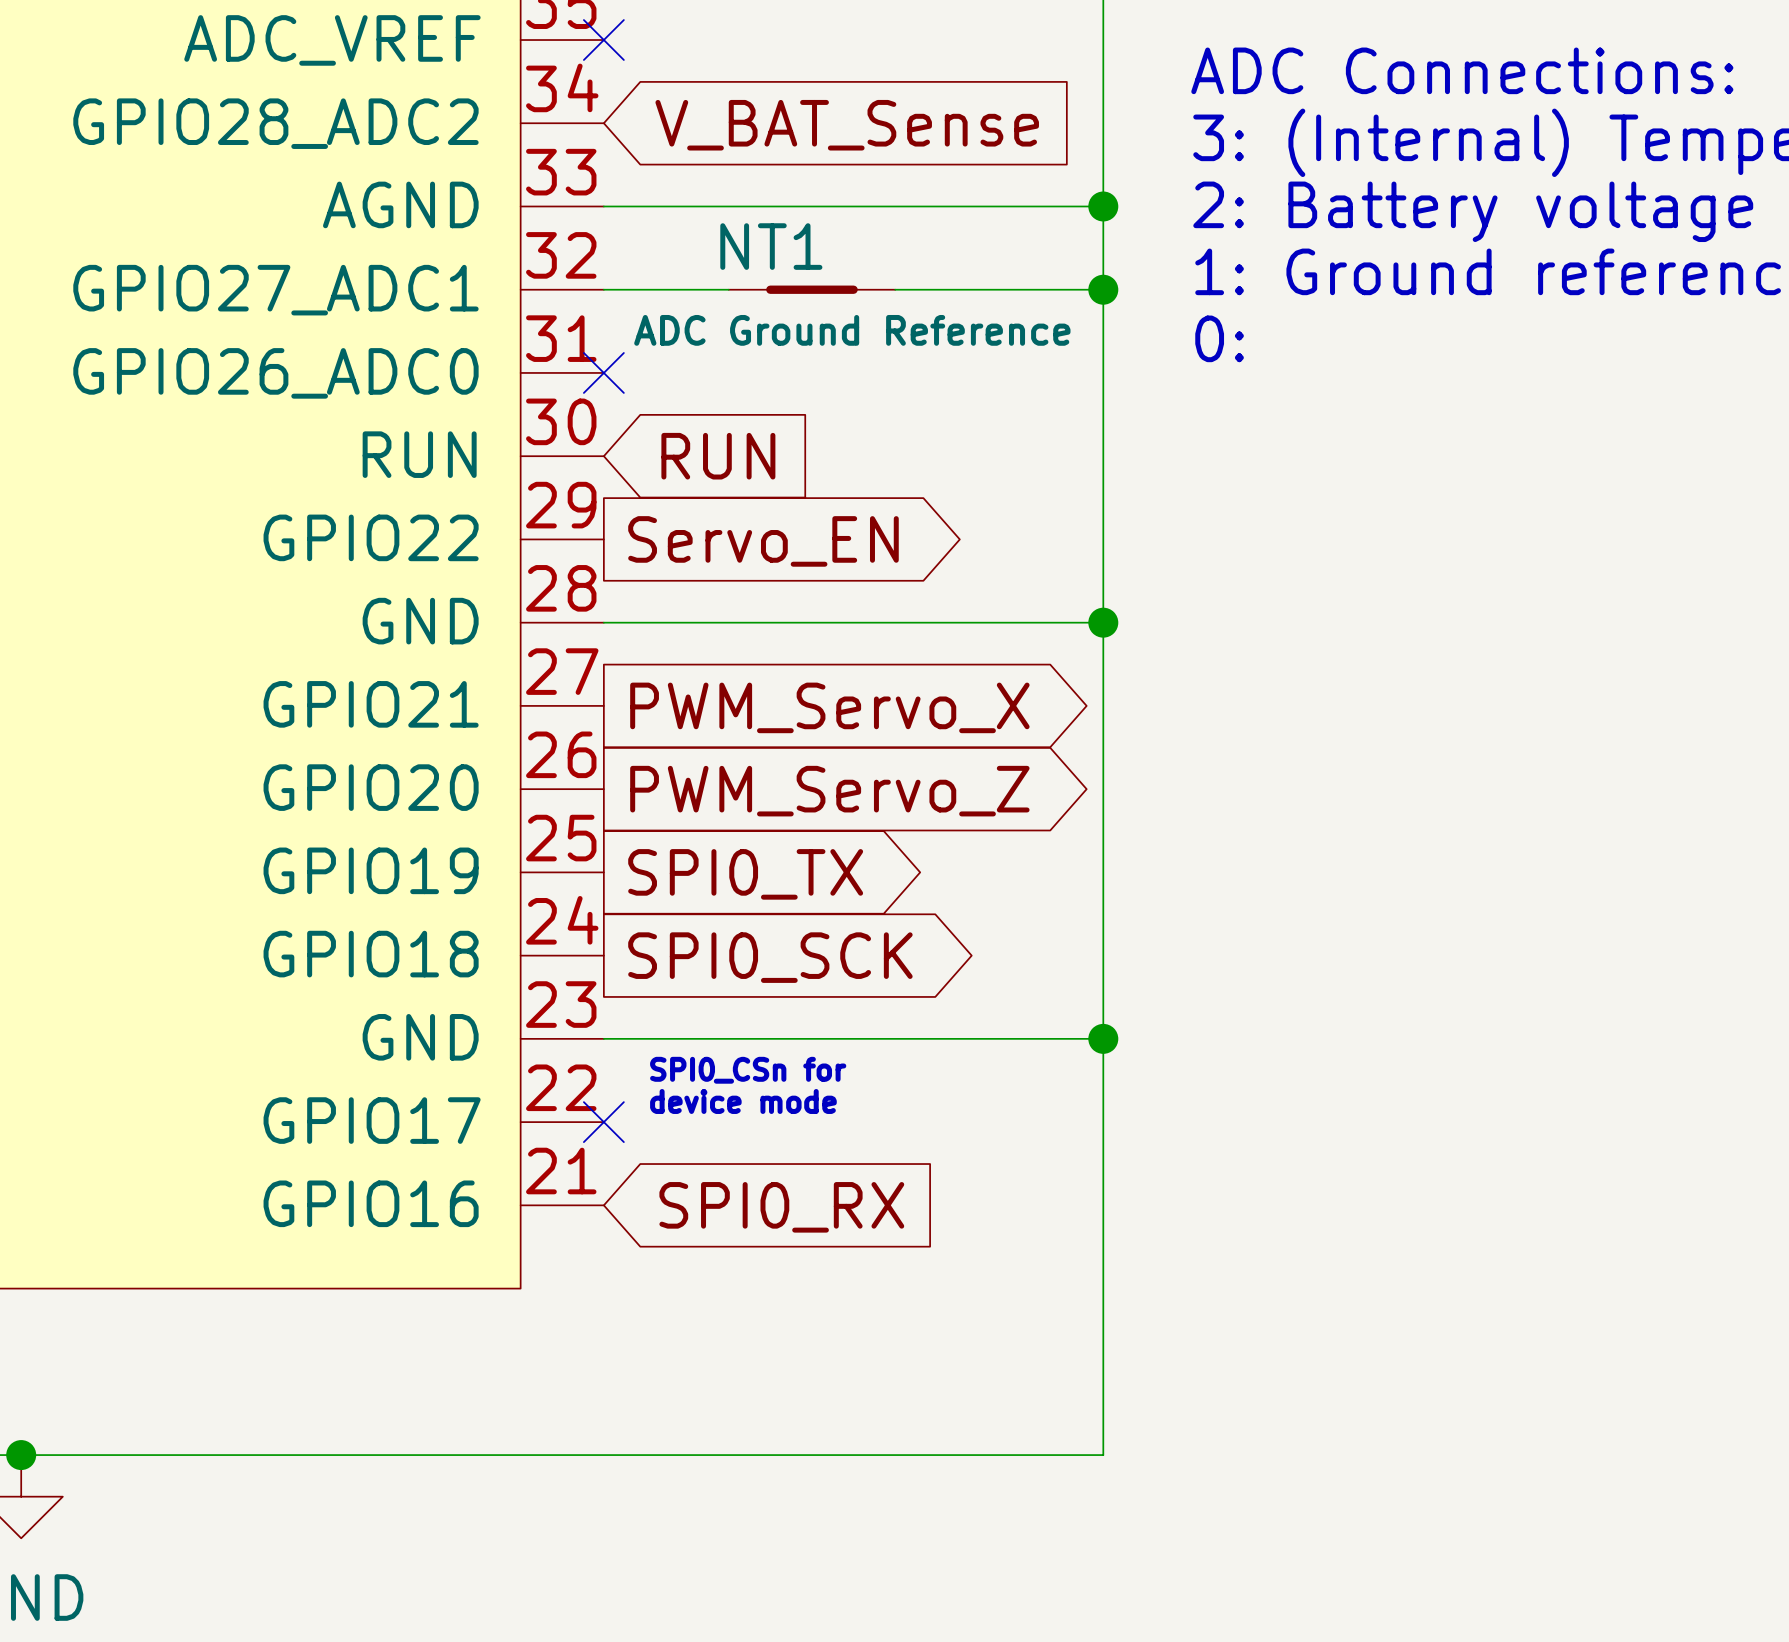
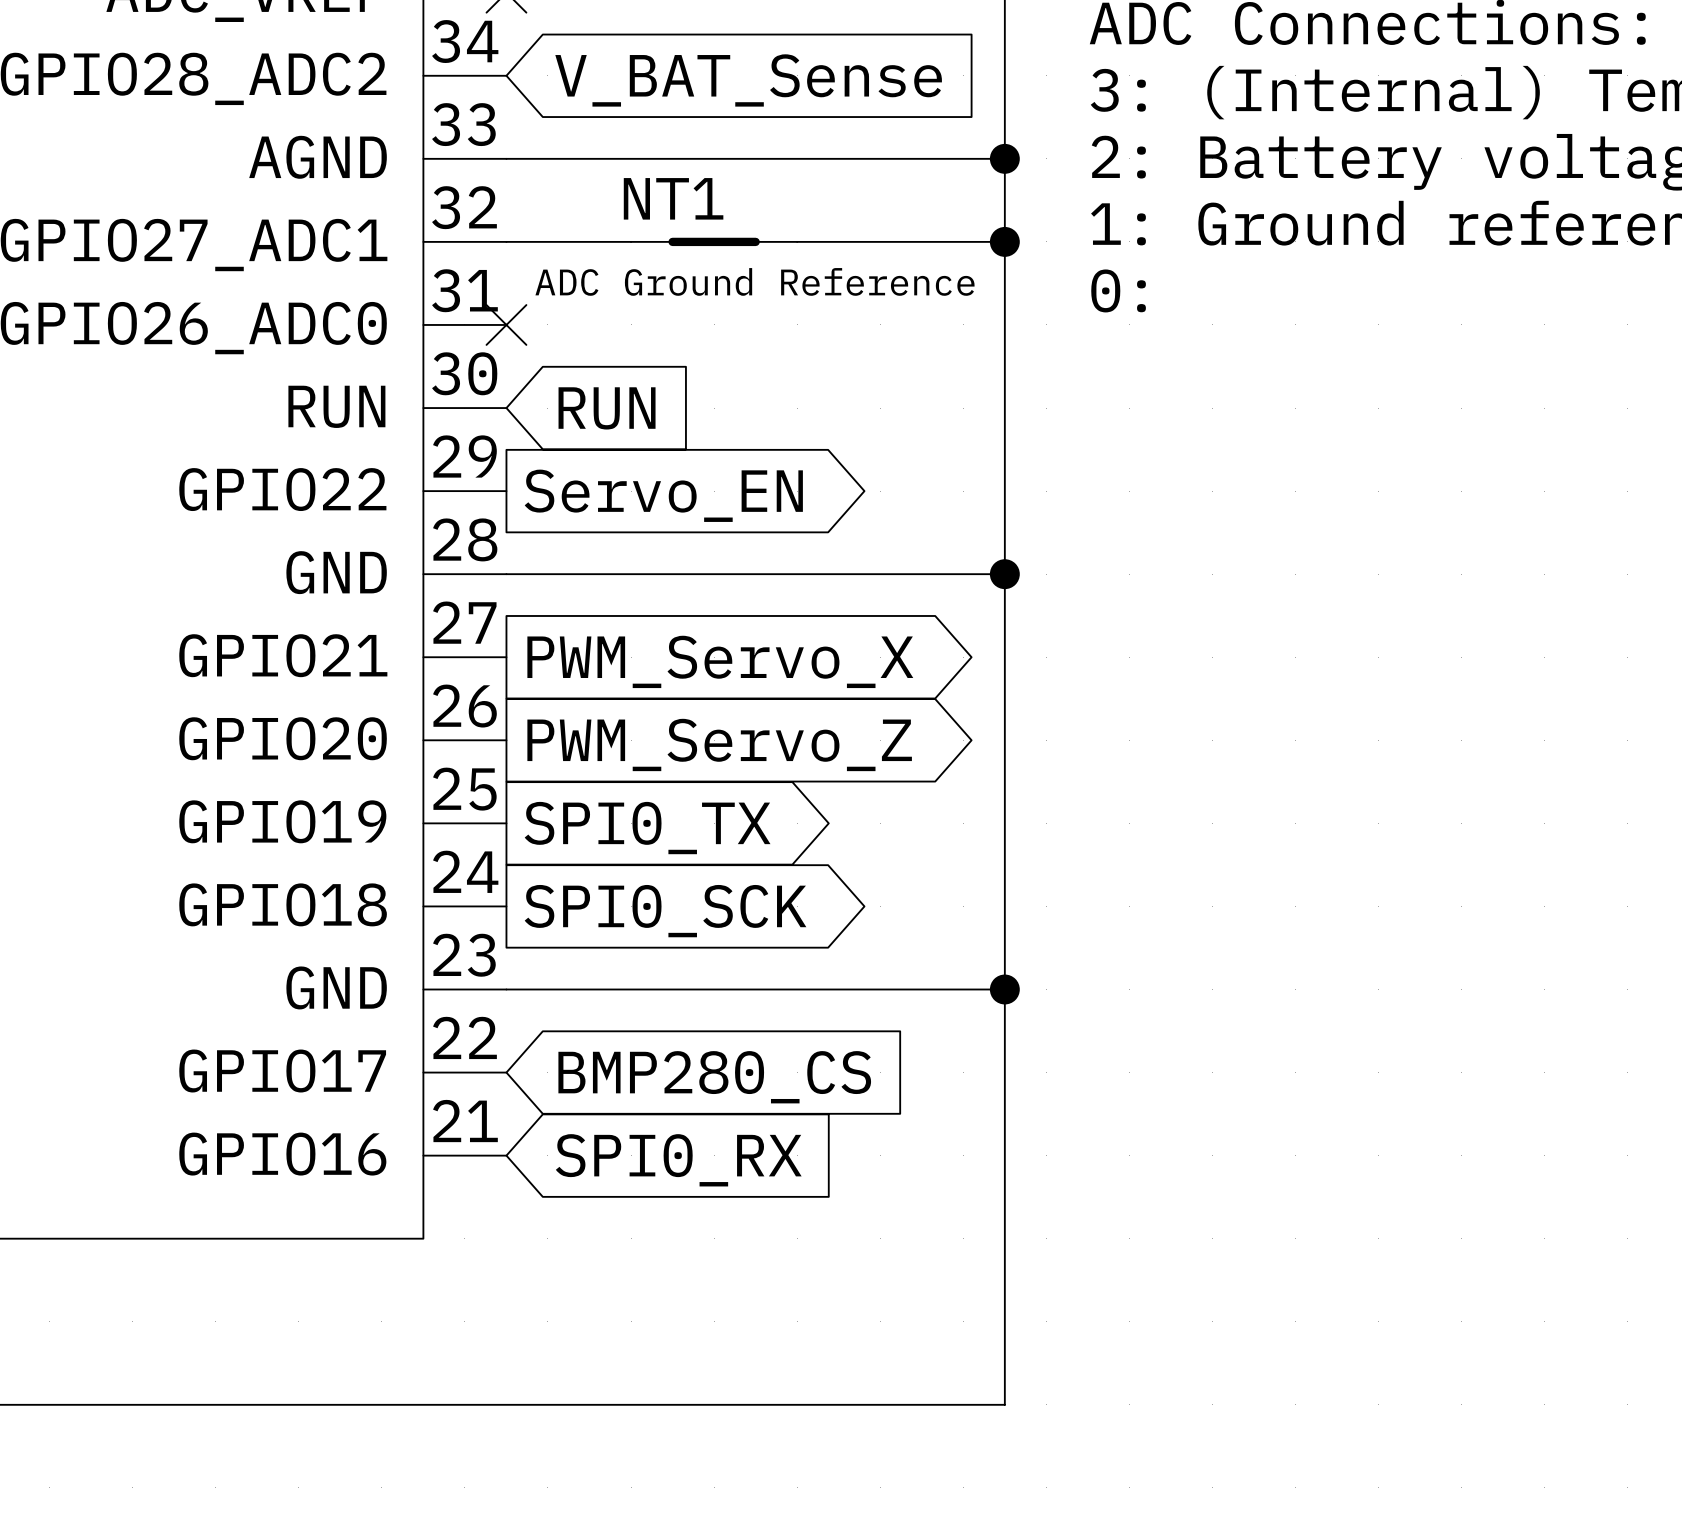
text: SPI0_CSn for (748, 1070) -> none
text: device mode (743, 1101) -> none
no-connect mark: (603, 1122) -> none
global label: none -> BMP280_CS (714, 1077)

